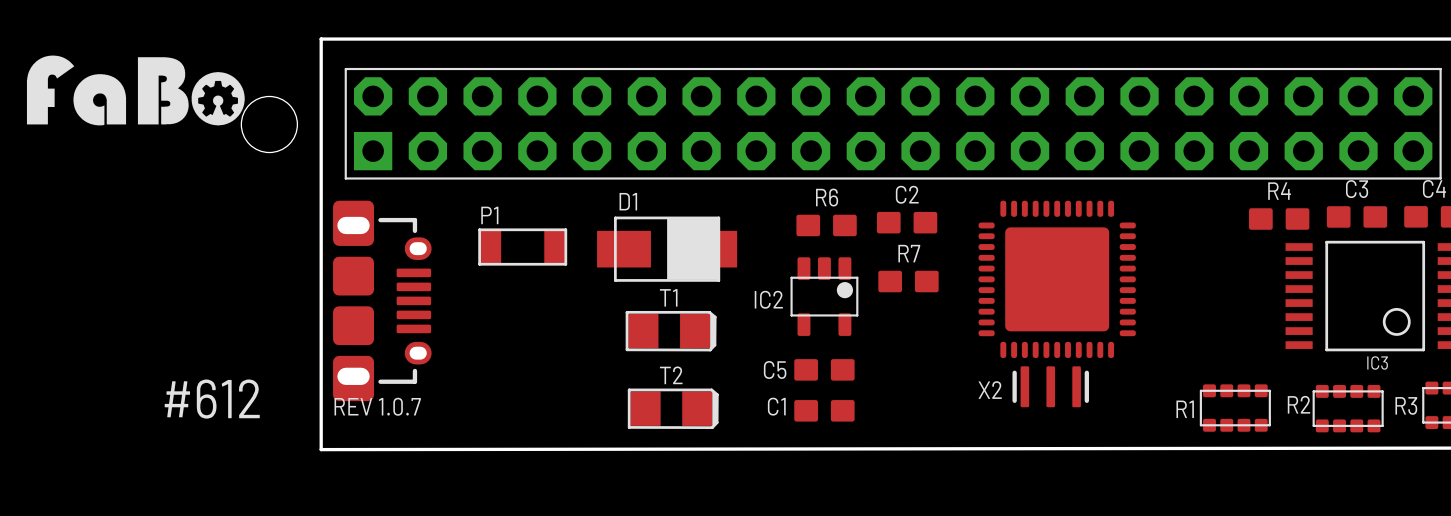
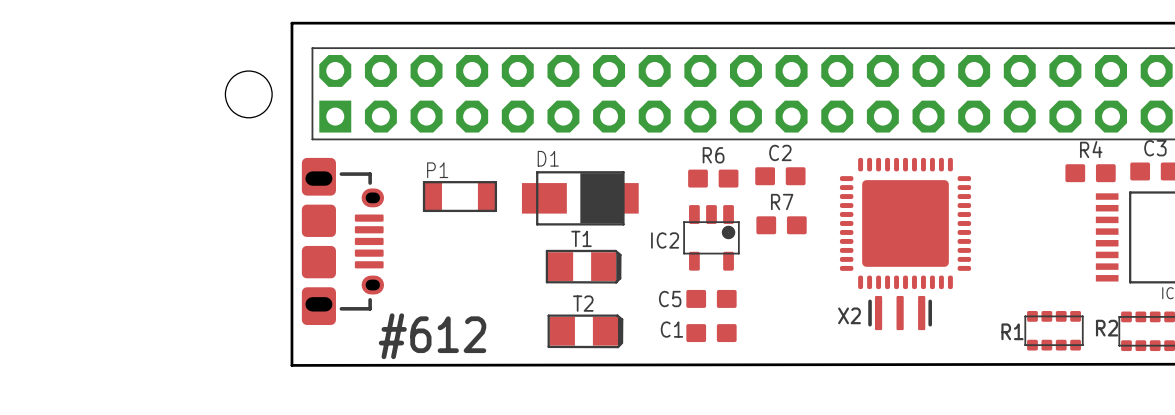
drawing: [26, 55, 245, 126] -> none
text position: #612 (212, 399) -> #612 (432, 336)
text: REV 1.0.7 (377, 406) -> none

